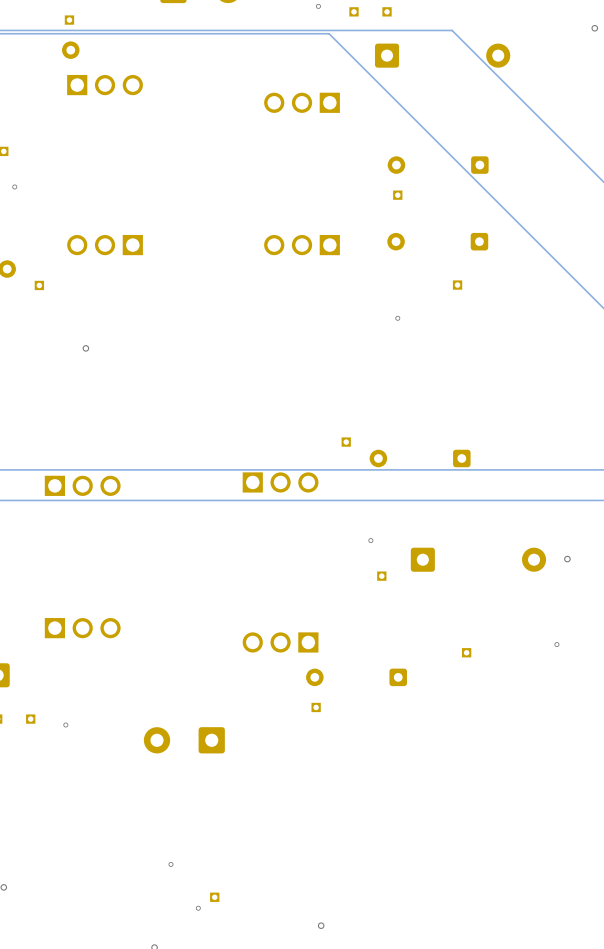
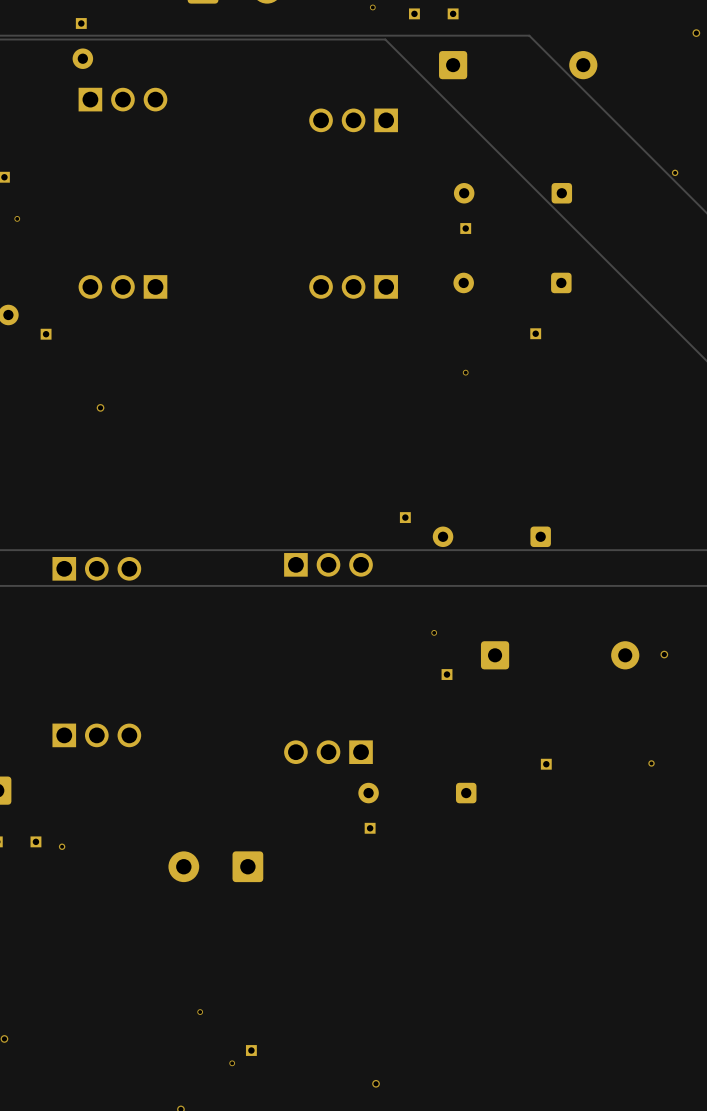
via: none -> (675, 172)
via: (556, 644) -> none
via: none -> (651, 763)
via: none -> (62, 846)
via: (65, 724) -> none

